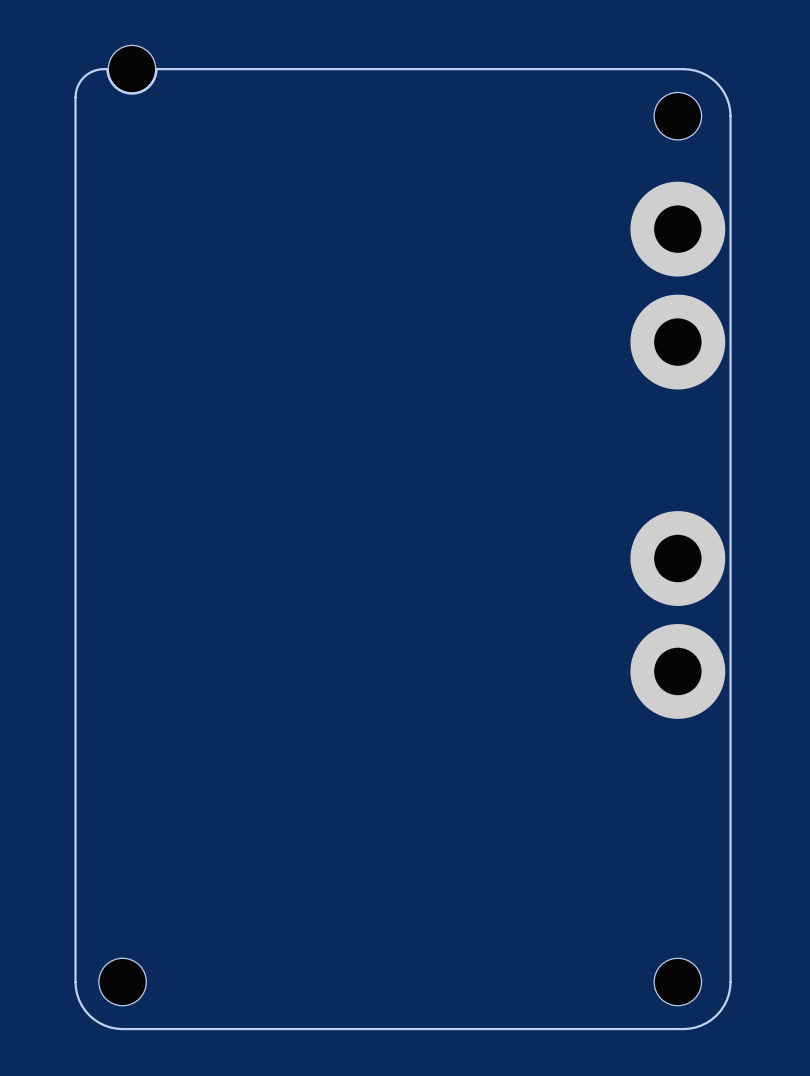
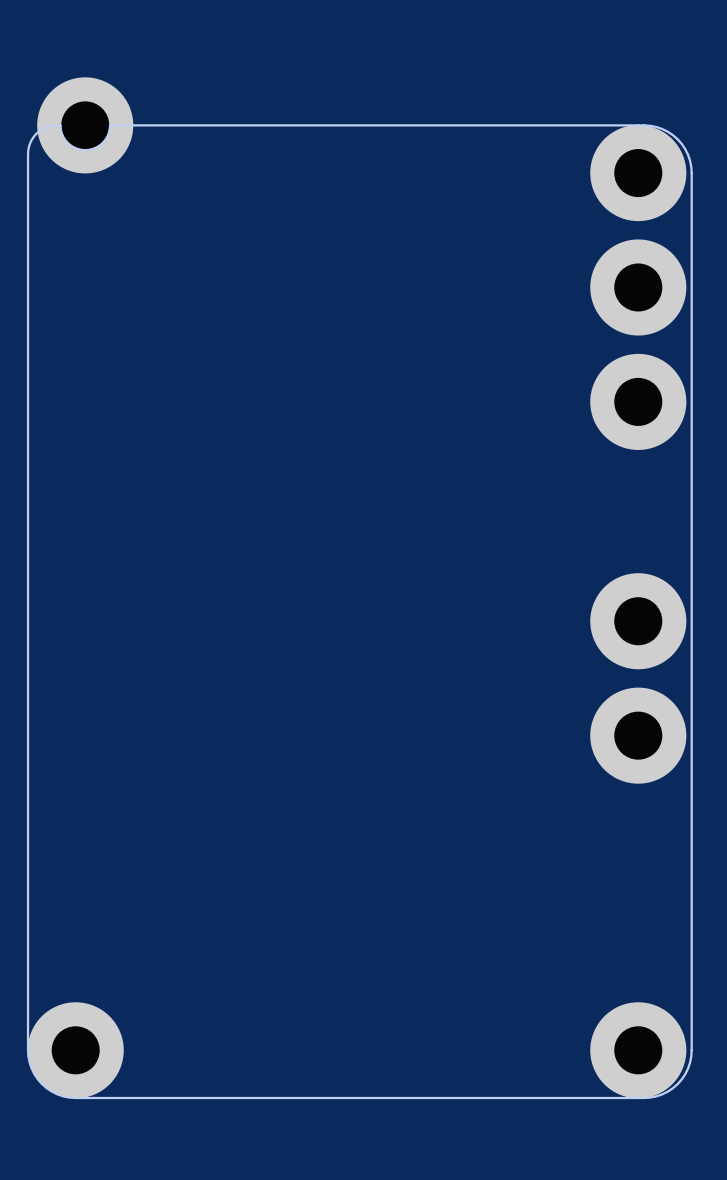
part footprint: [108, 45, 156, 93] -> [37, 77, 134, 174]
part footprint: [654, 92, 702, 140] -> [590, 125, 687, 222]
part footprint: [98, 958, 147, 1006] -> [27, 1002, 124, 1099]
part footprint: [654, 958, 702, 1006] -> [590, 1002, 687, 1099]

